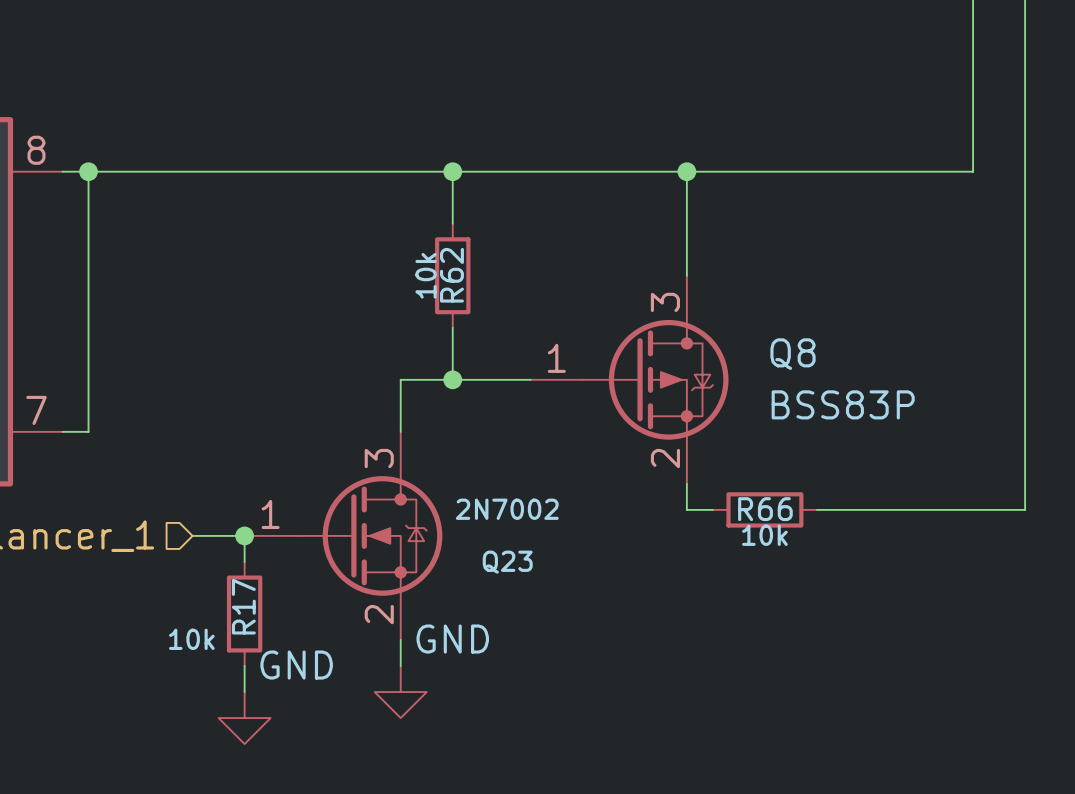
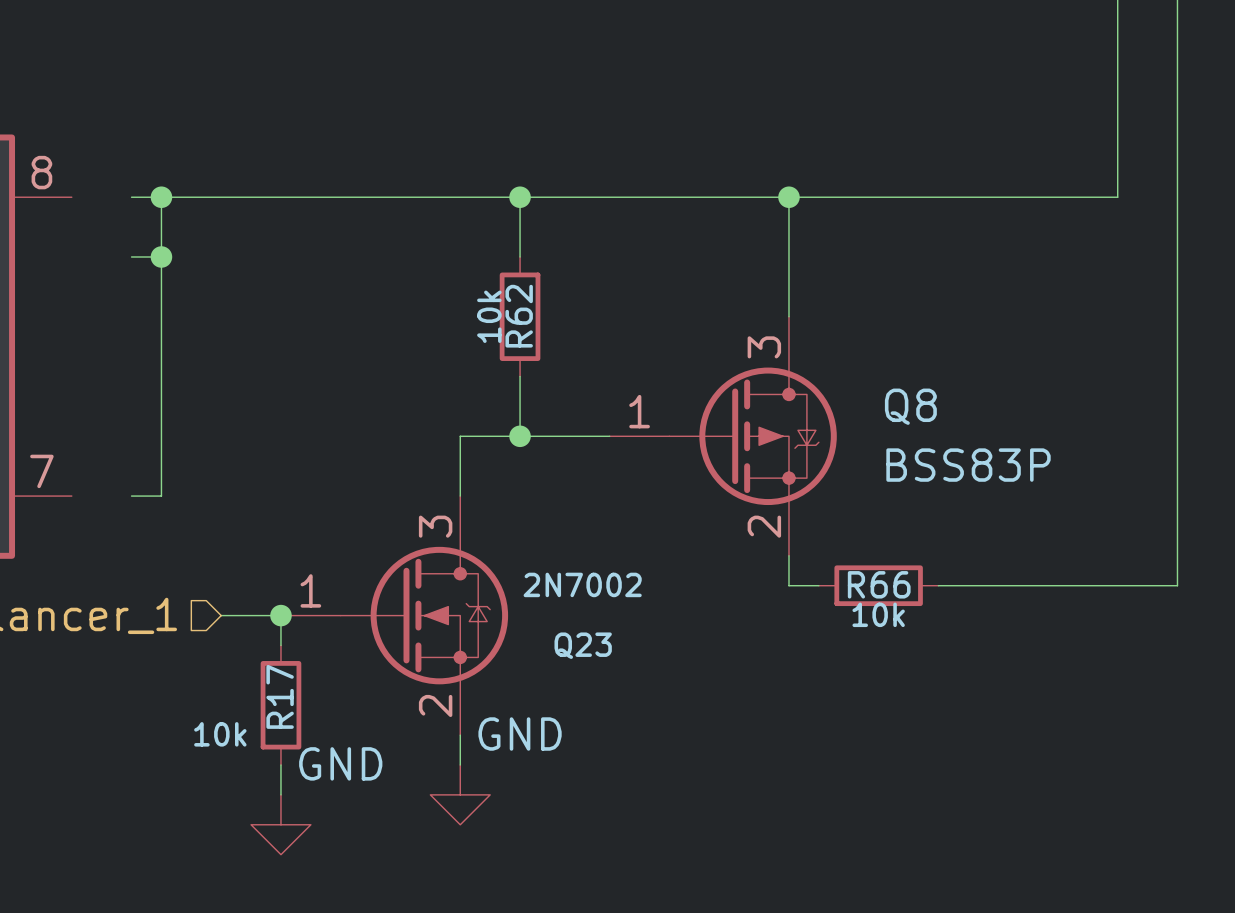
wire: (62, 171) (114, 171) -> none
wire: (88, 171) (88, 431) (62, 431) -> (161, 197) (161, 496) (131, 496)
junction: (88, 171) -> none
junction: none -> (161, 197)
wire: none -> (131, 257) (161, 257)
junction: none -> (161, 257)

